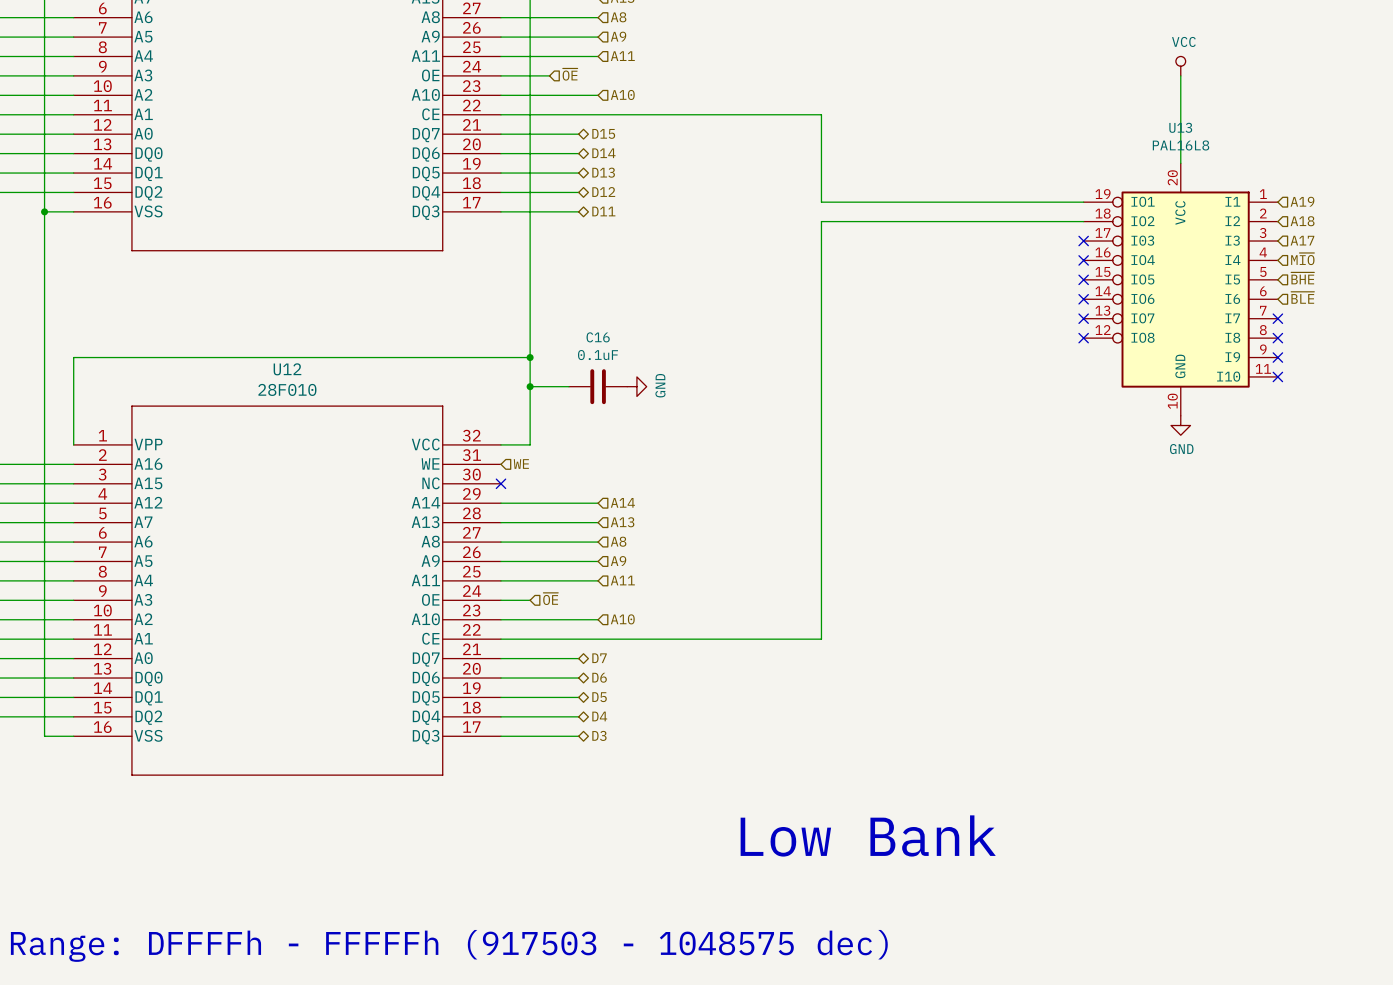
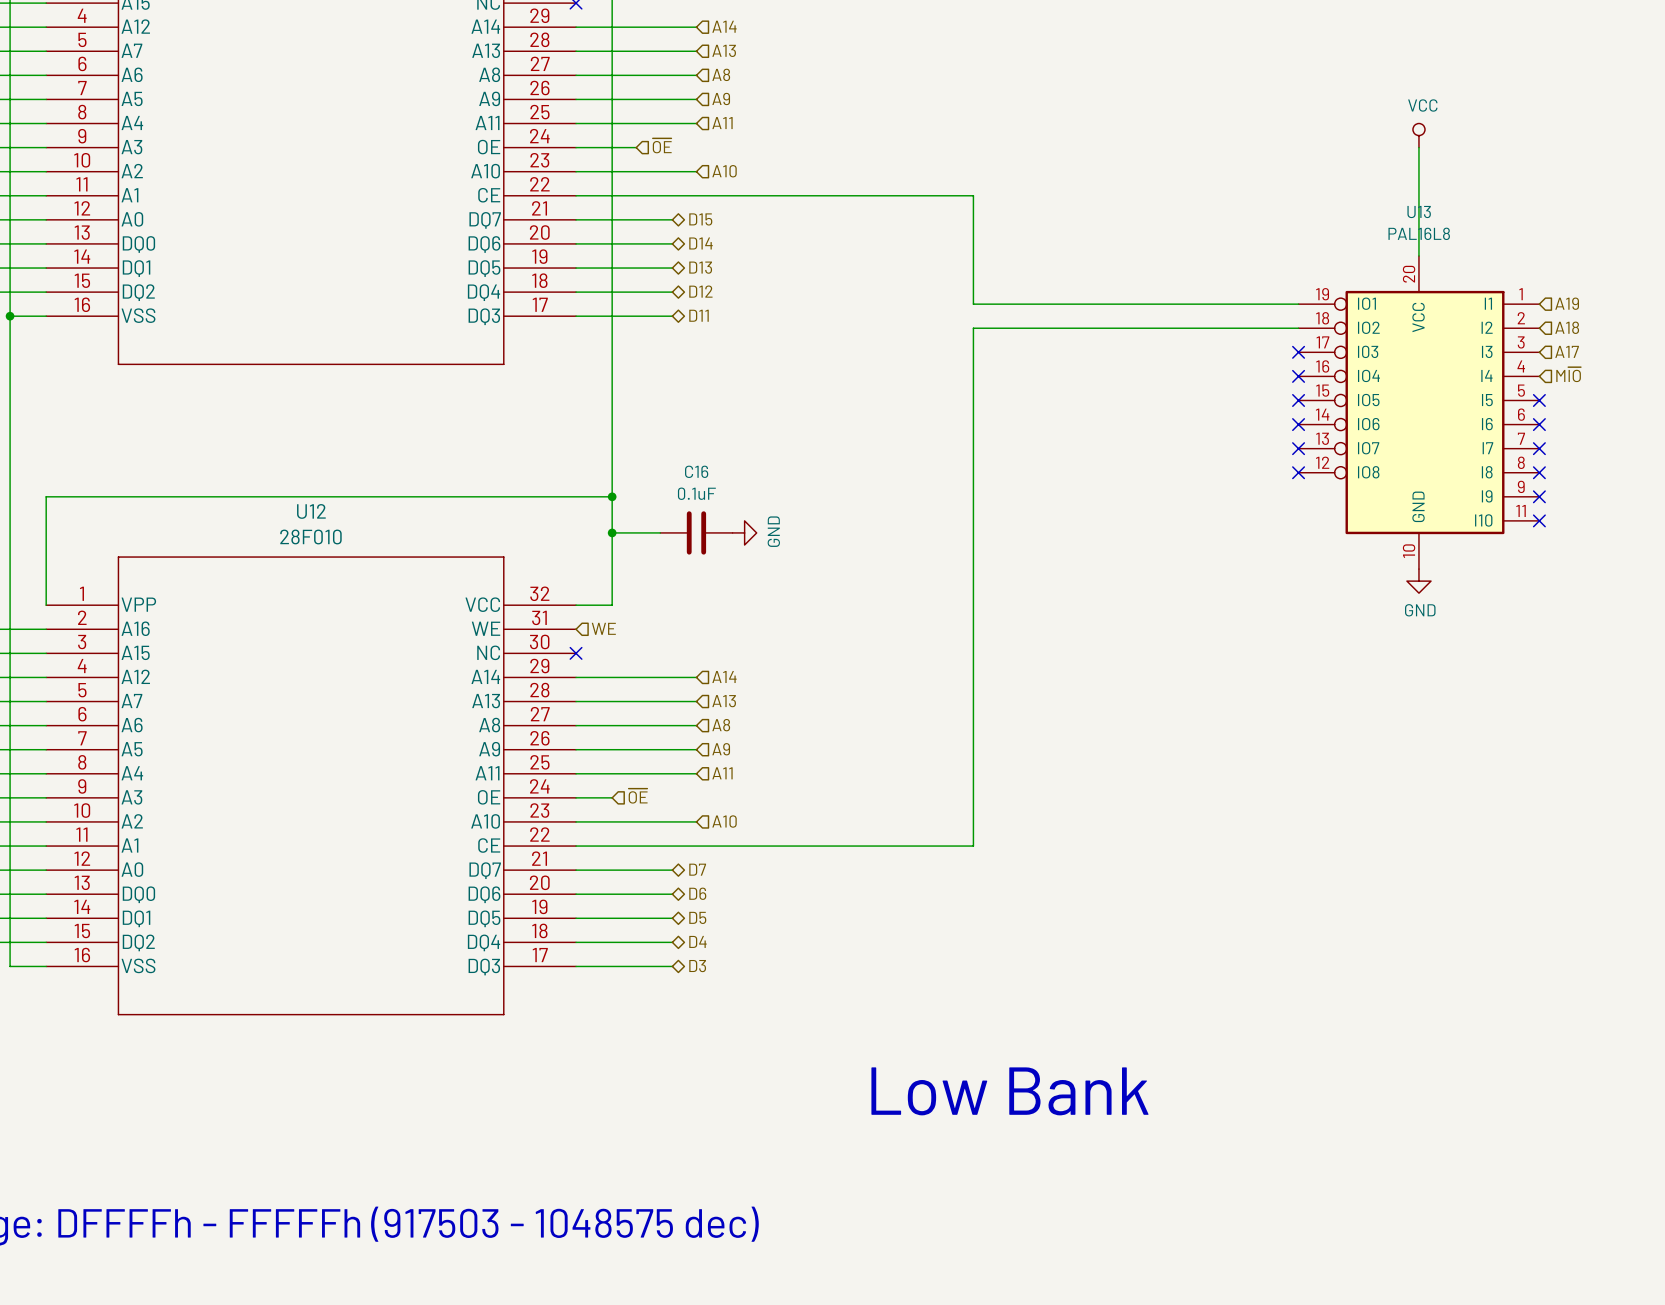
hierarchical label: ~{BHE} (1302, 278) -> none
no-connect mark: none -> (1539, 400)
hierarchical label: ~{BLE} (1302, 297) -> none
no-connect mark: none -> (1539, 424)

